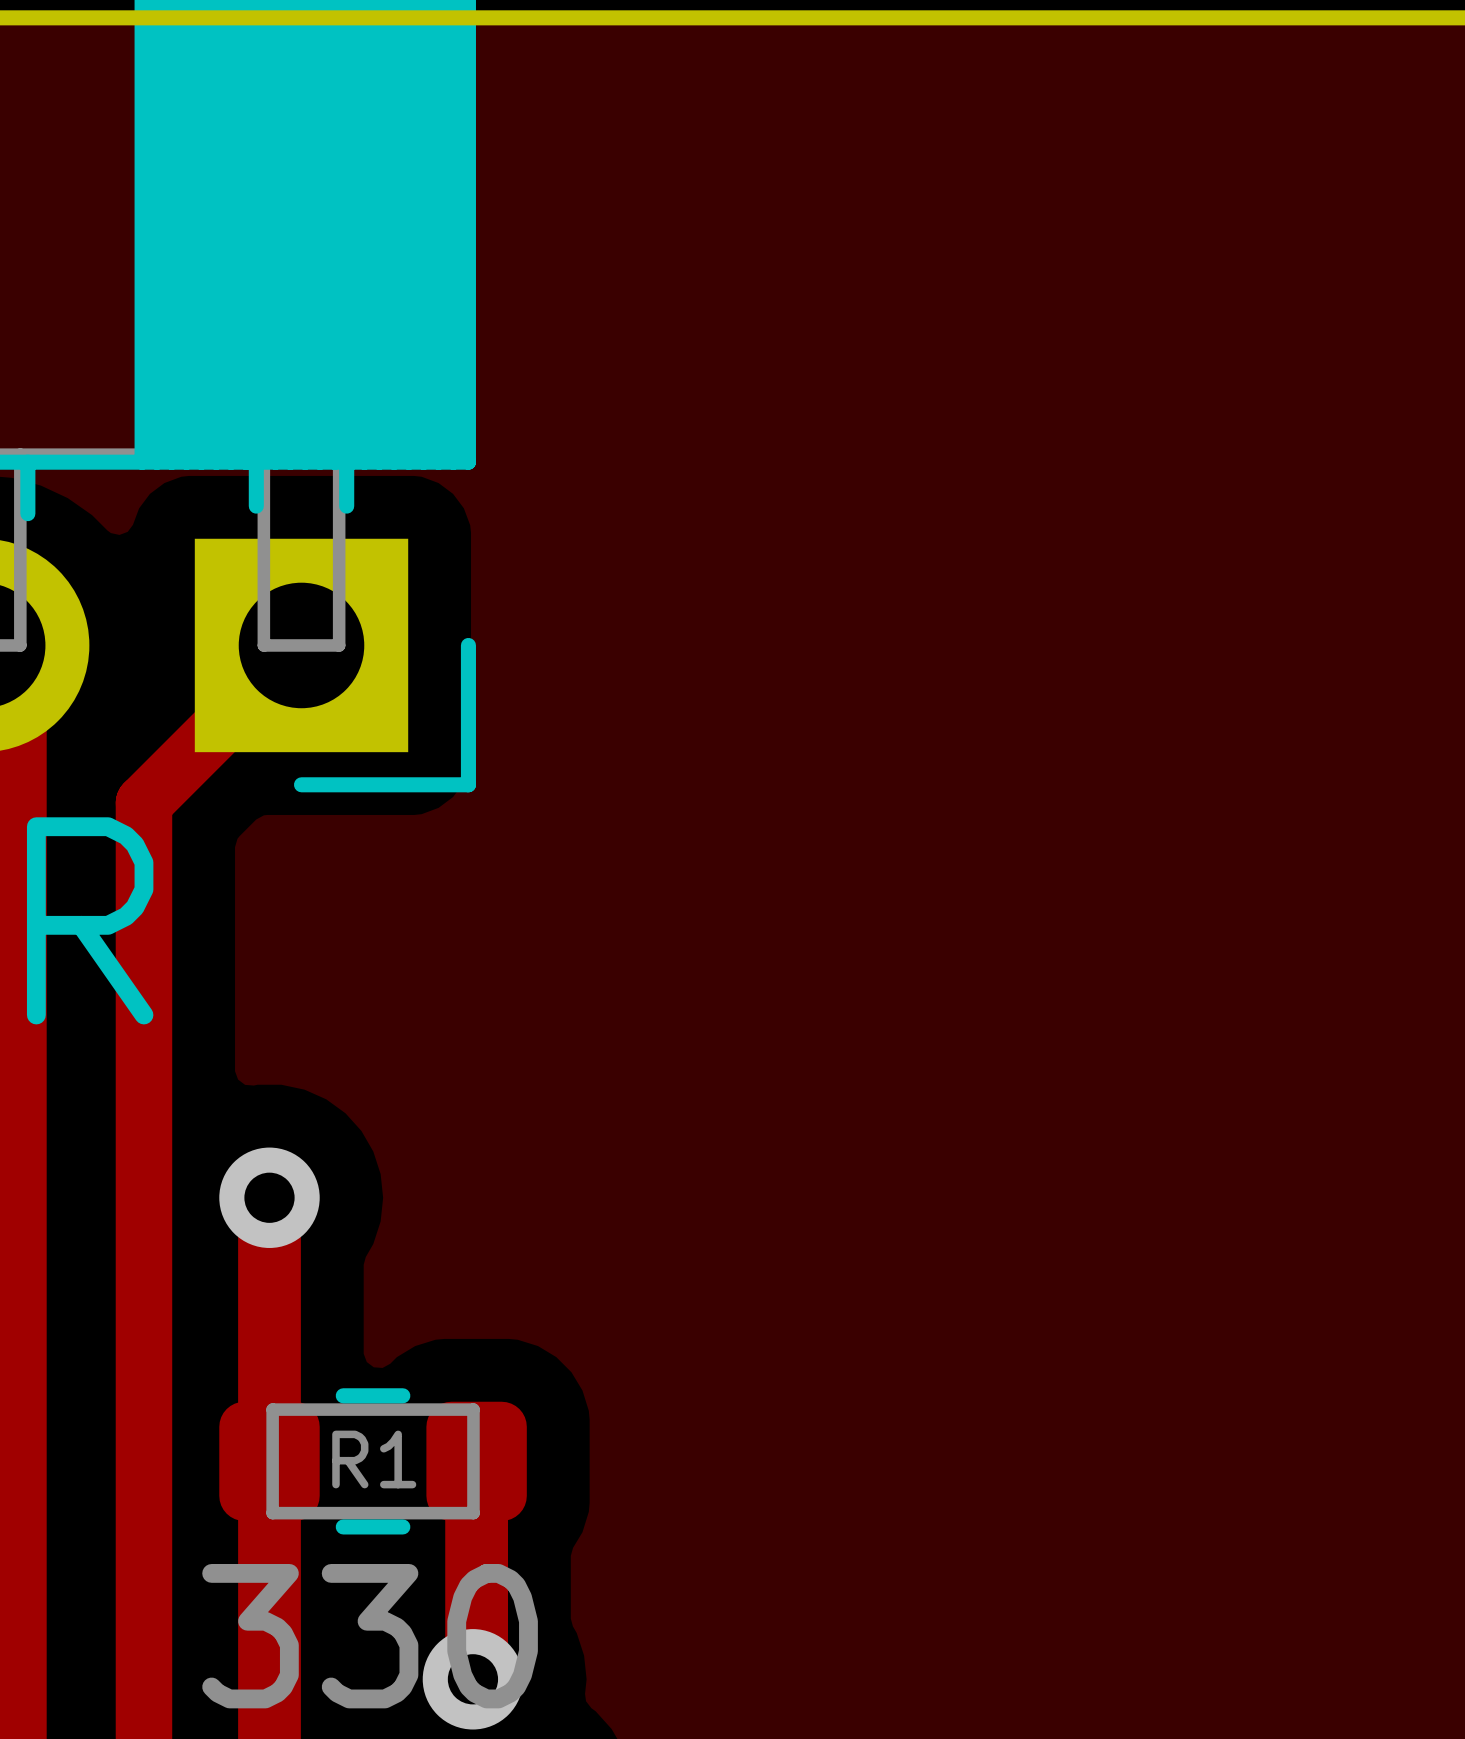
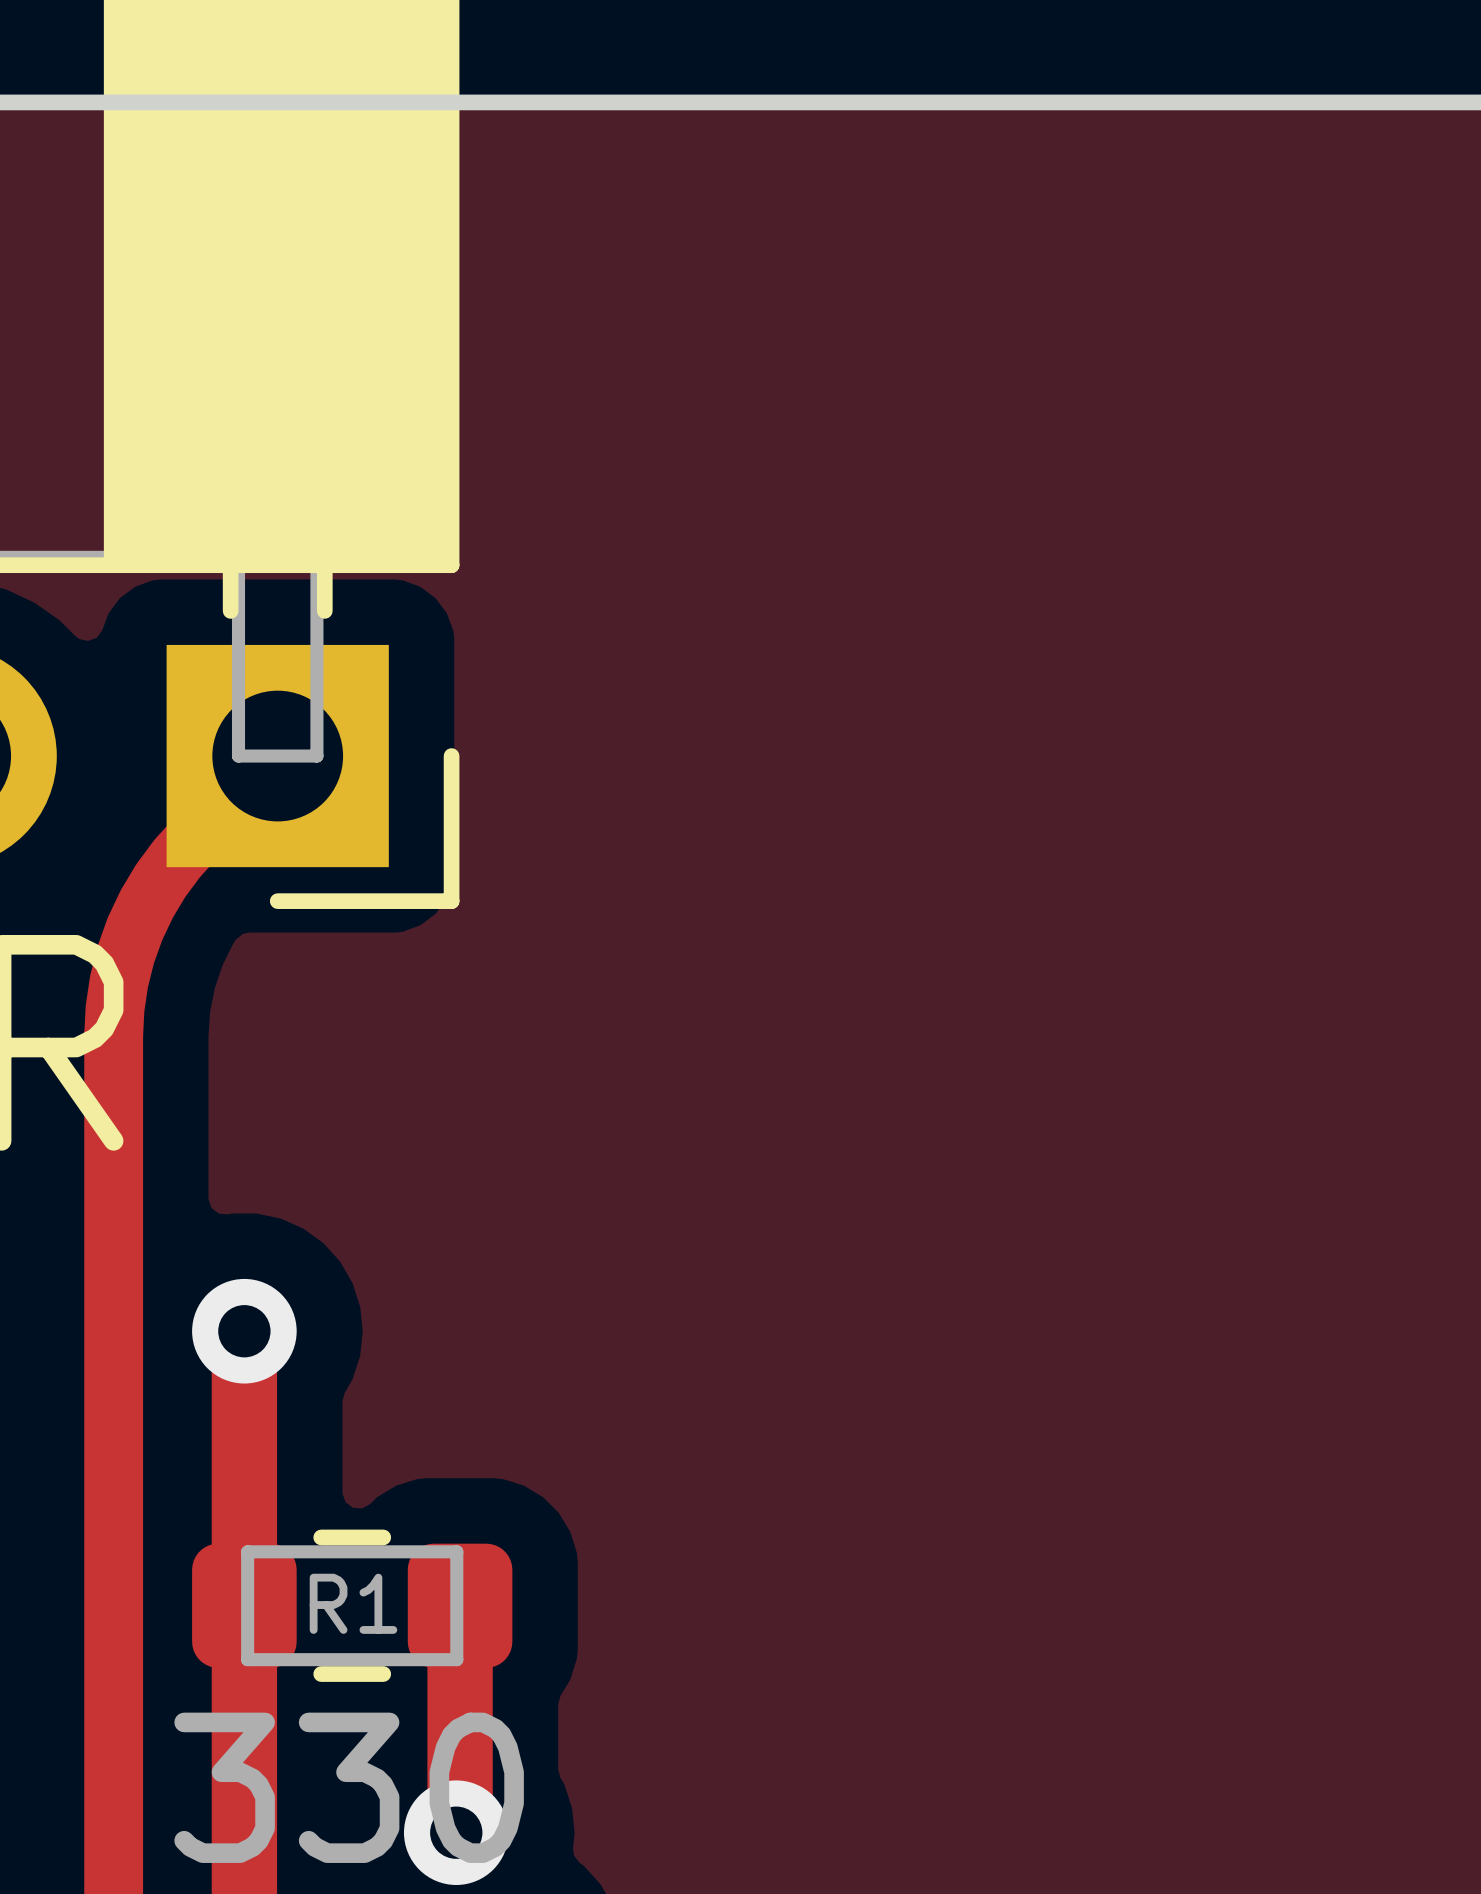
track: (222, 724) (143, 802) (143, 914) -> (195, 838) (160, 880) (134, 928) (119, 981) (113, 1036)

